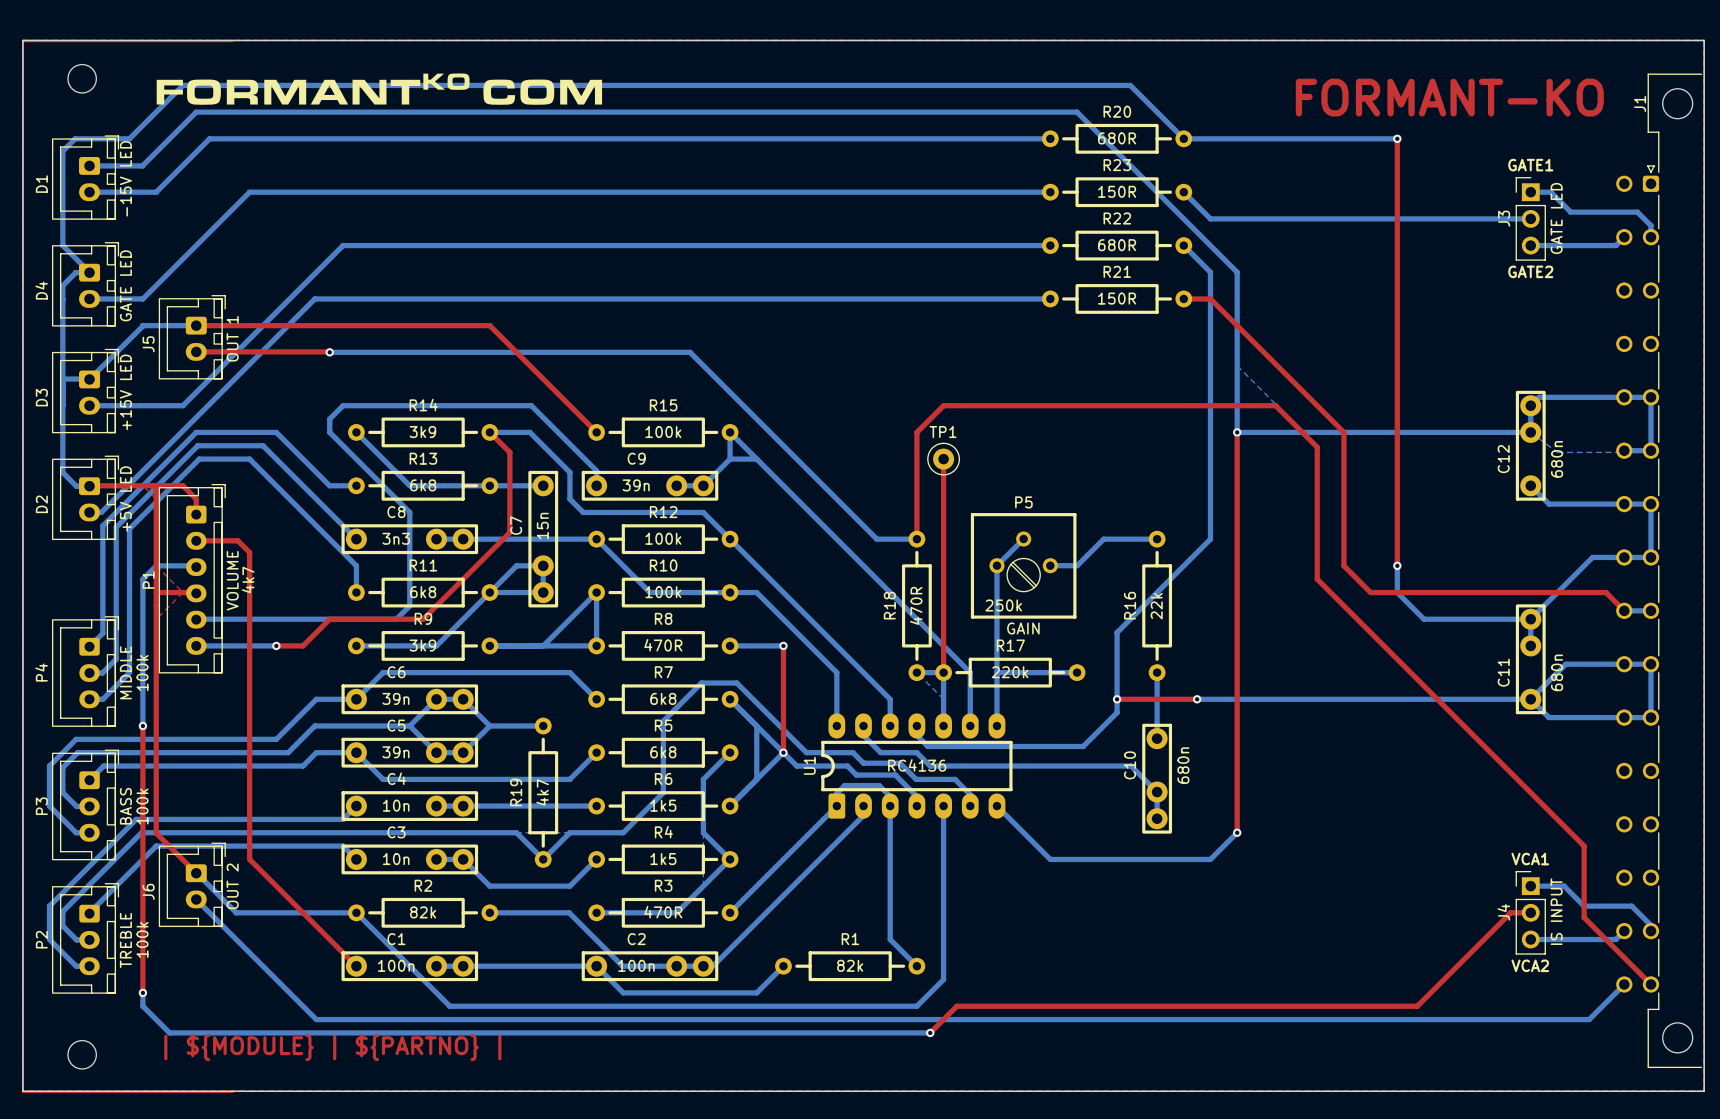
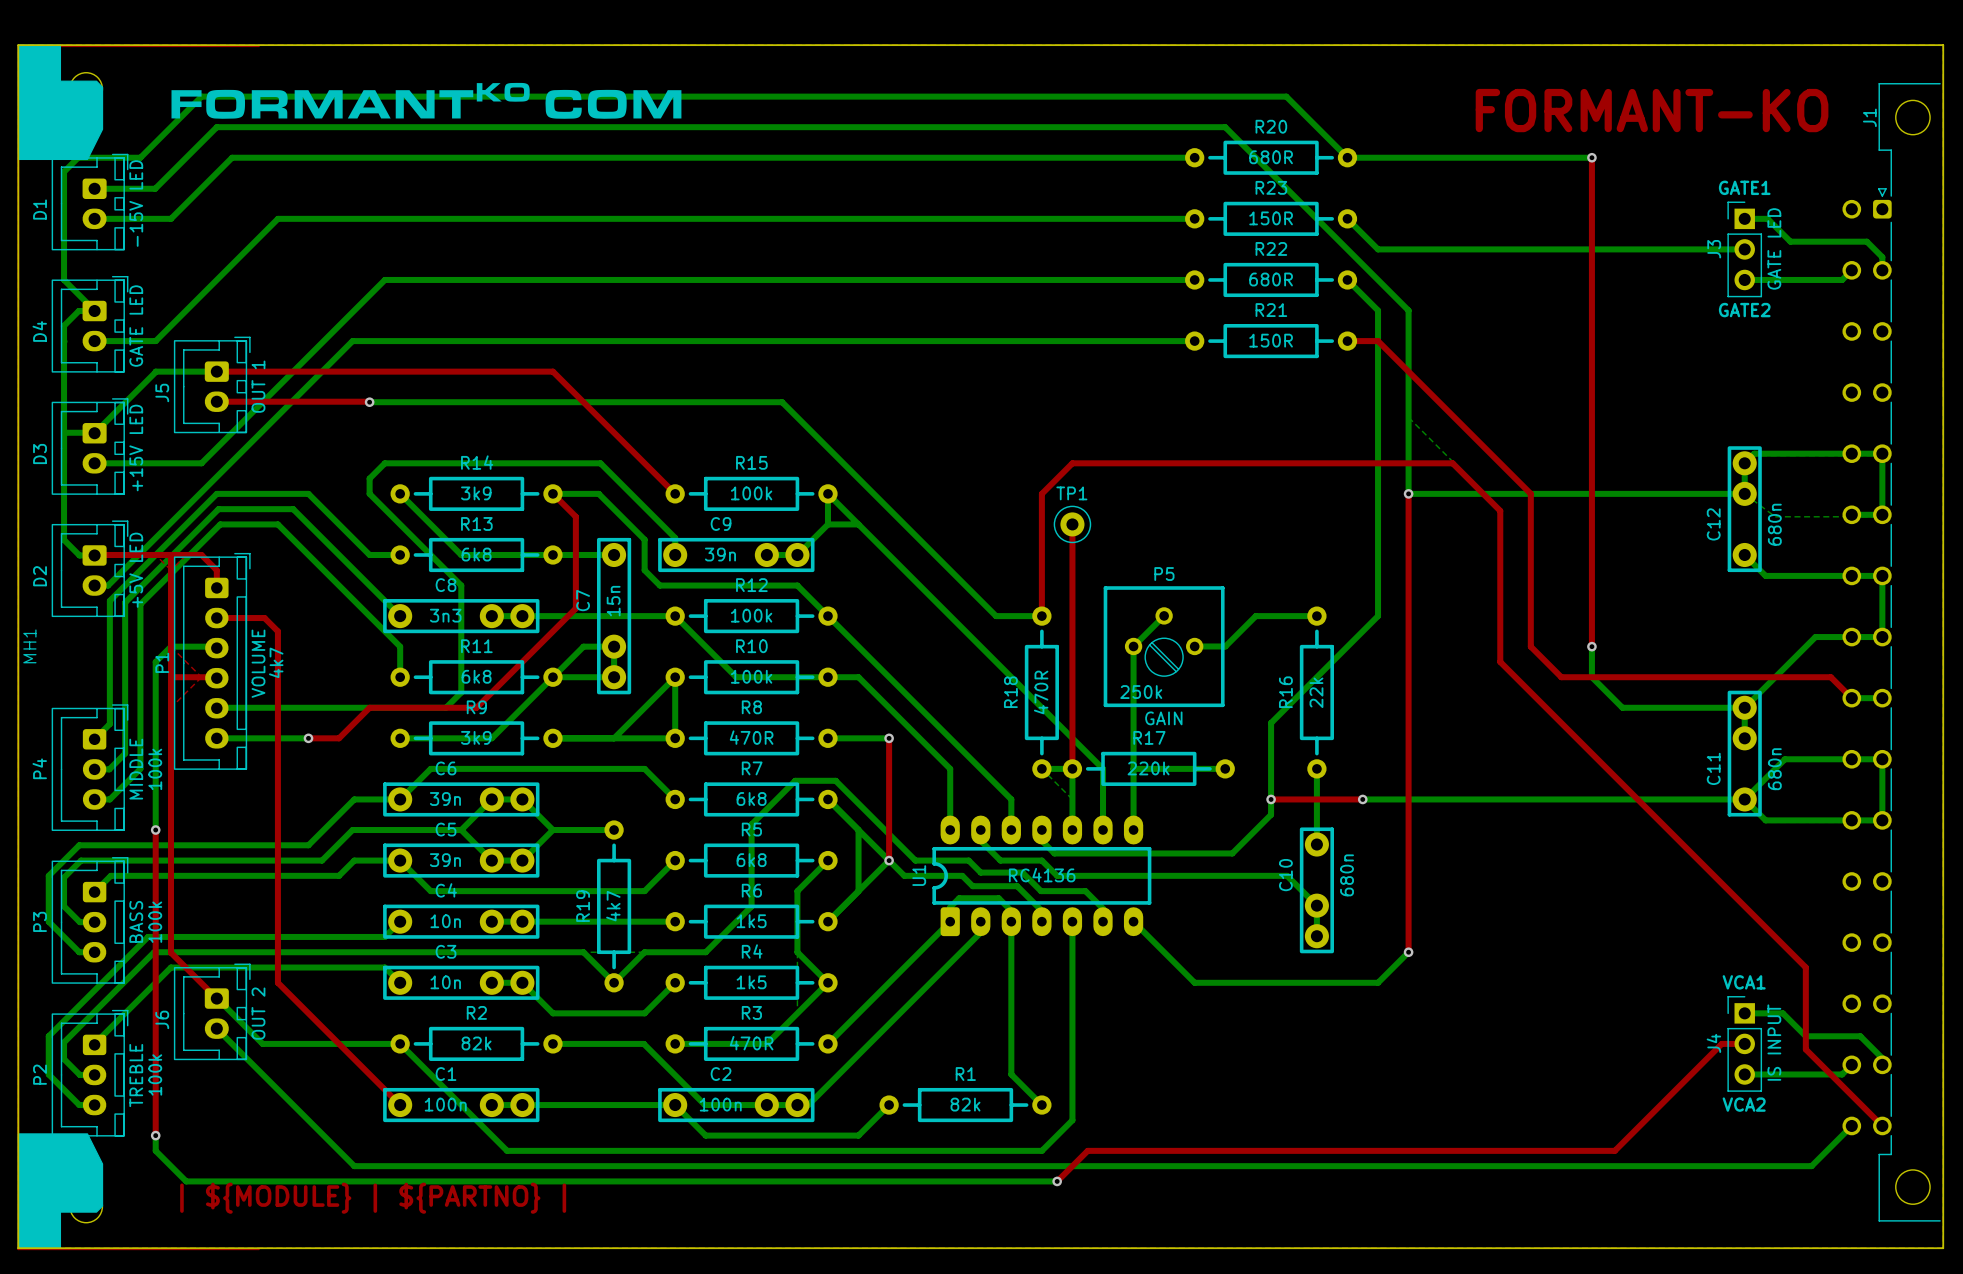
MH1: none -> (60, 646)

